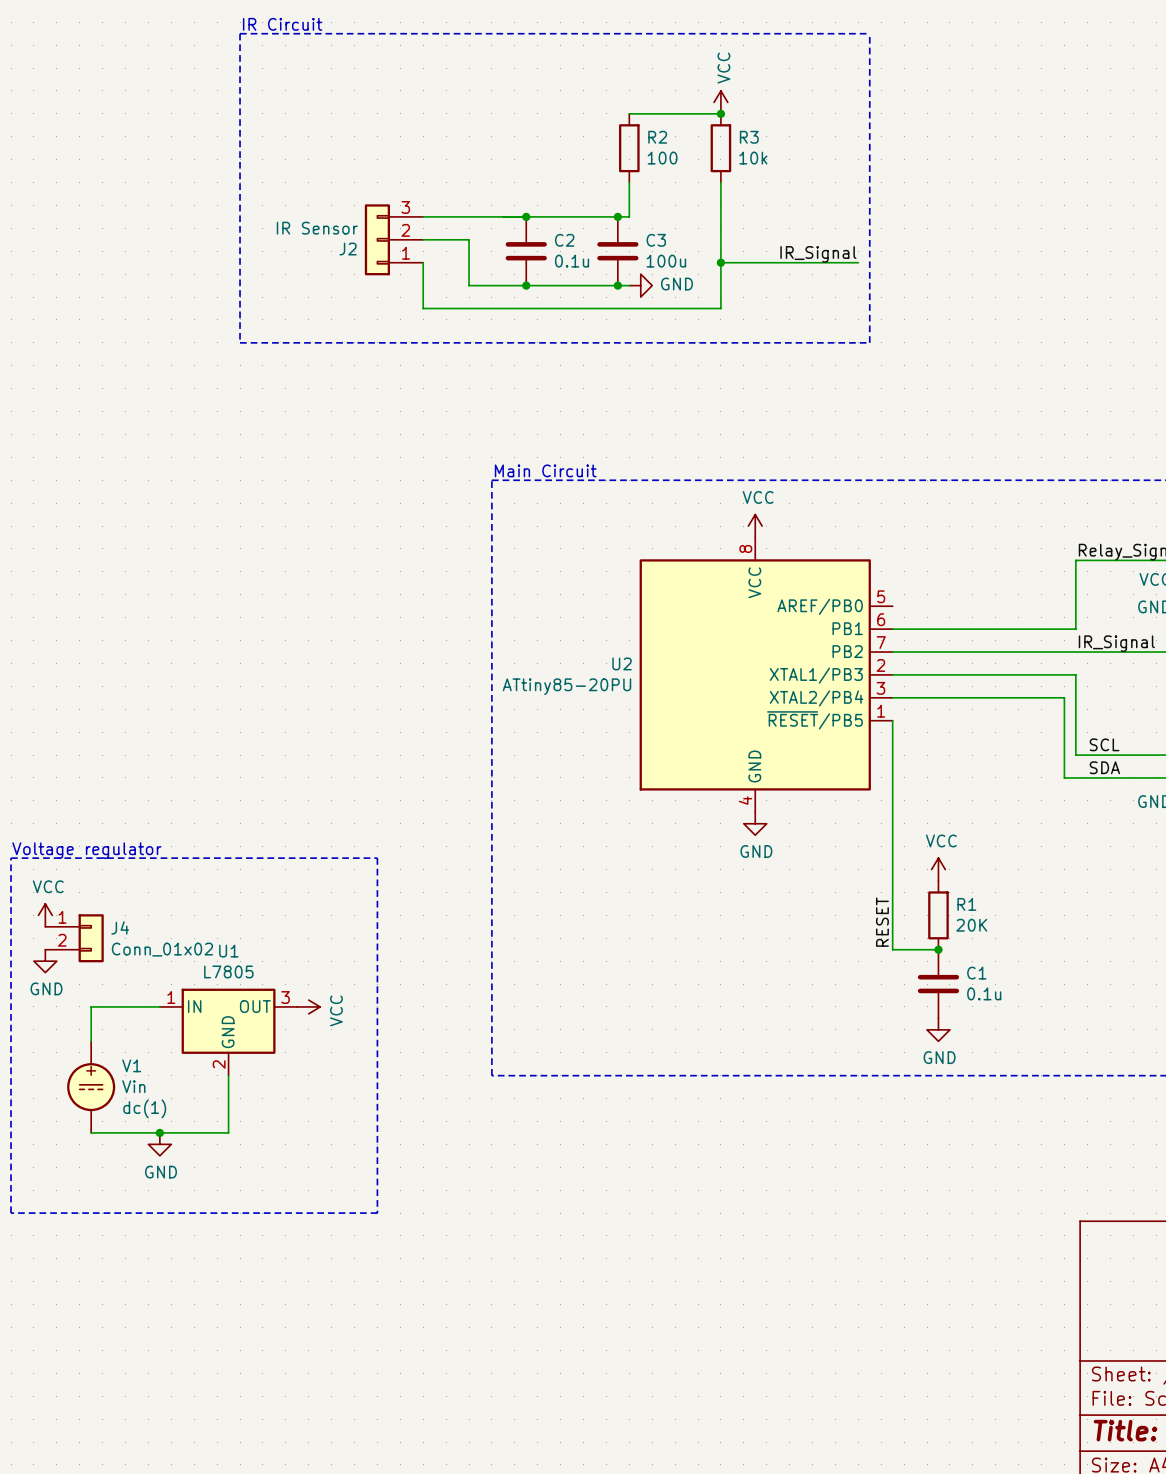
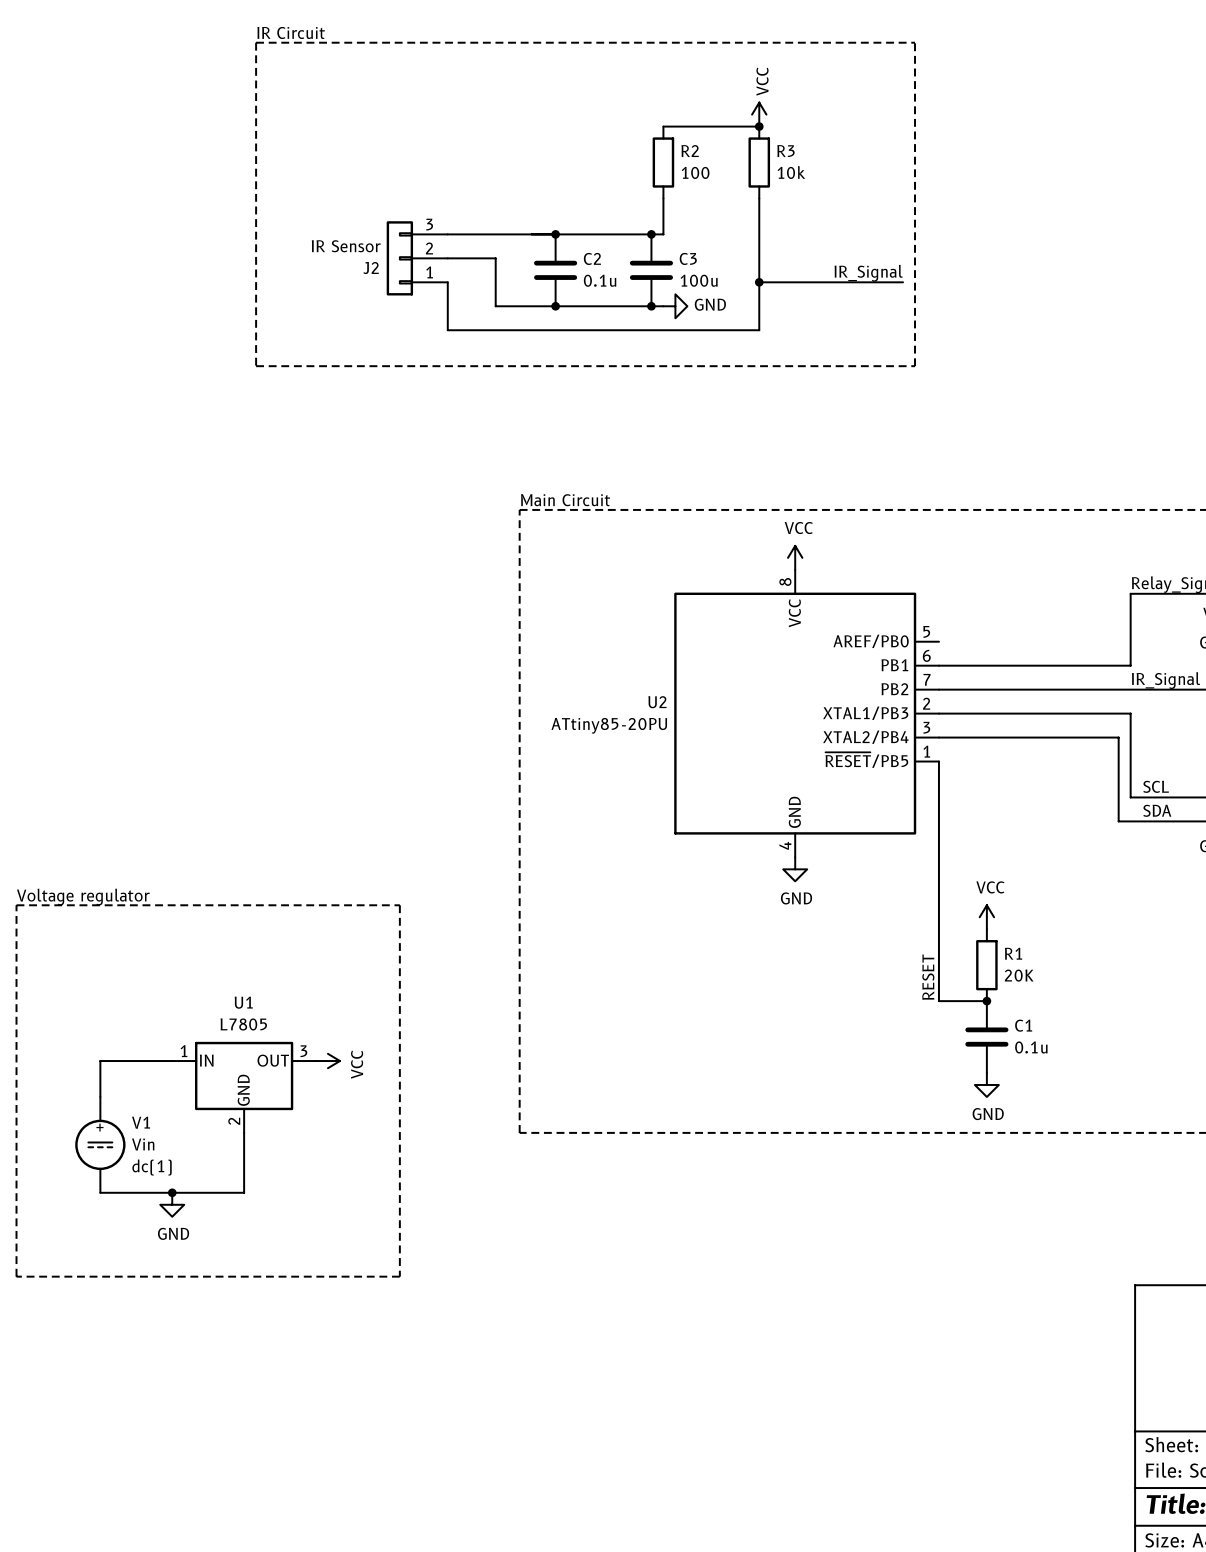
power symbol: VCC (45, 915) -> none
J4: Conn_01x02 (74, 938) -> none
power symbol: GND (45, 961) -> none

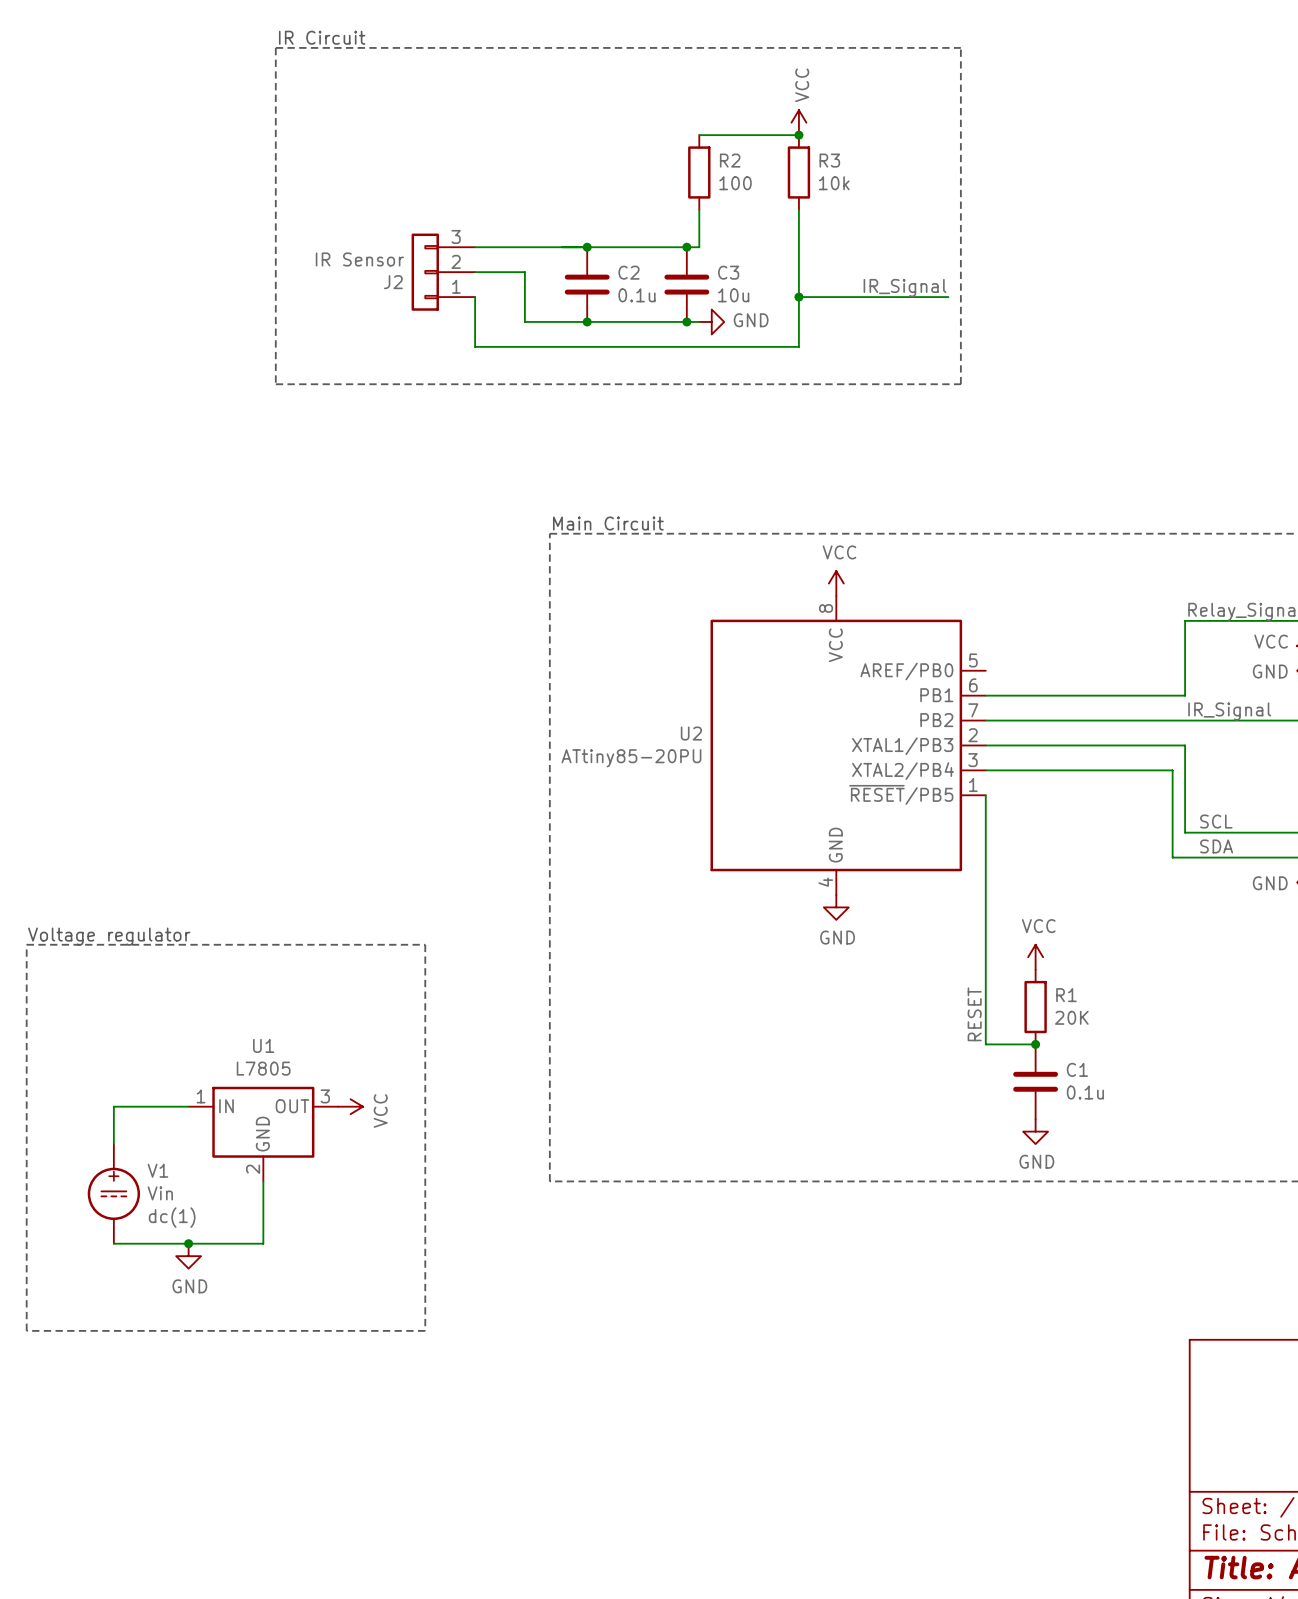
C3 value: 100u (699, 280) -> 10u (733, 295)

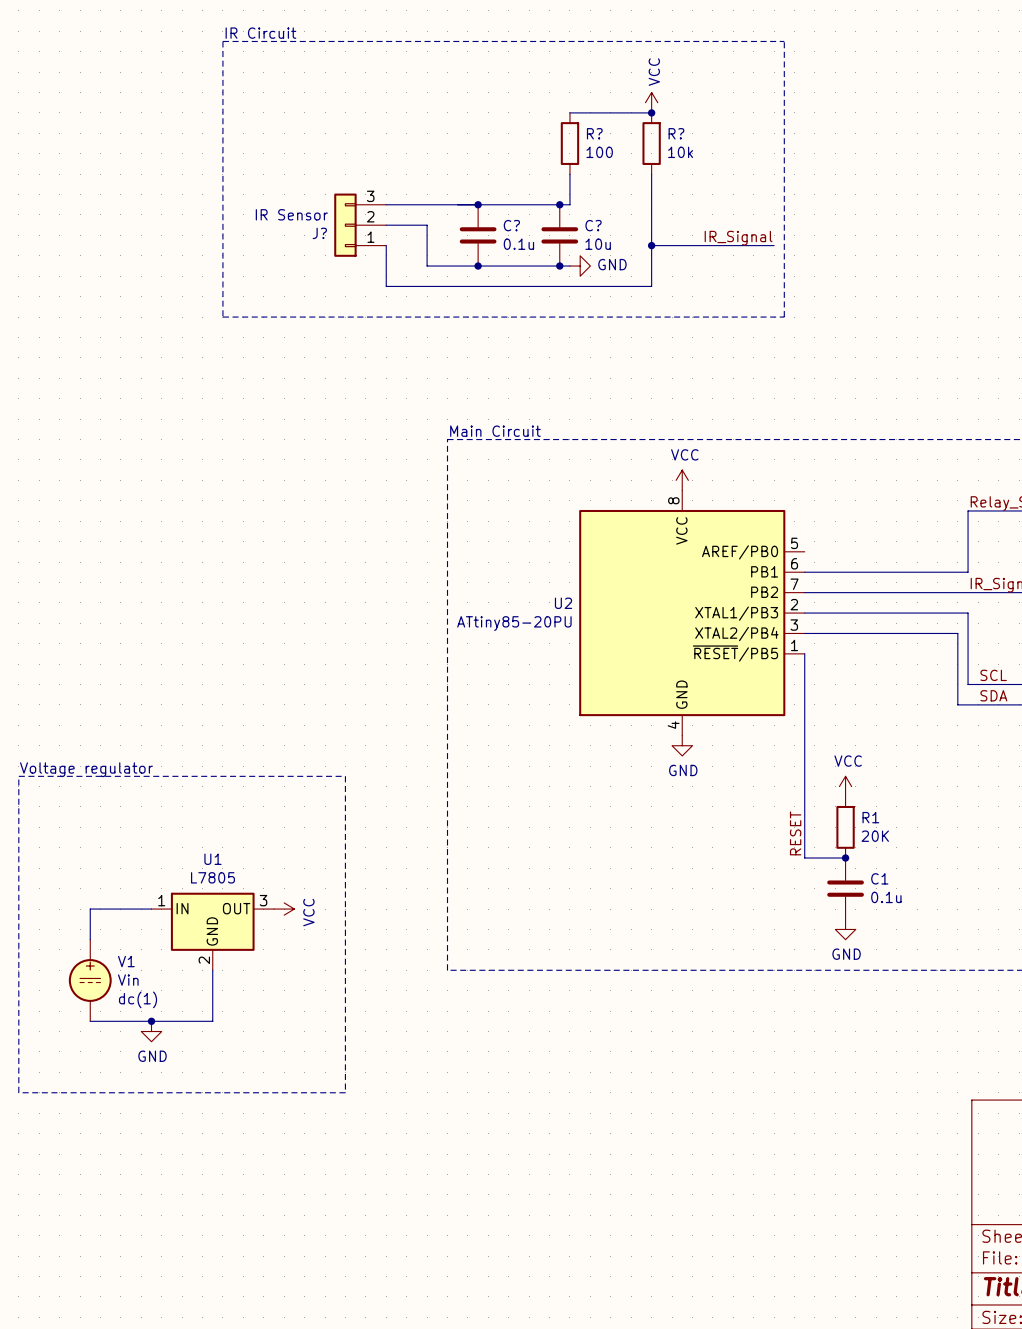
R2 name: R2 (730, 160) -> R? (594, 133)
R3 name: R3 (829, 160) -> R? (676, 133)
C2 name: C2 (628, 272) -> C? (511, 225)
C3 name: C3 (728, 272) -> C? (593, 225)
J2 name: J2 (393, 282) -> J? (319, 233)

